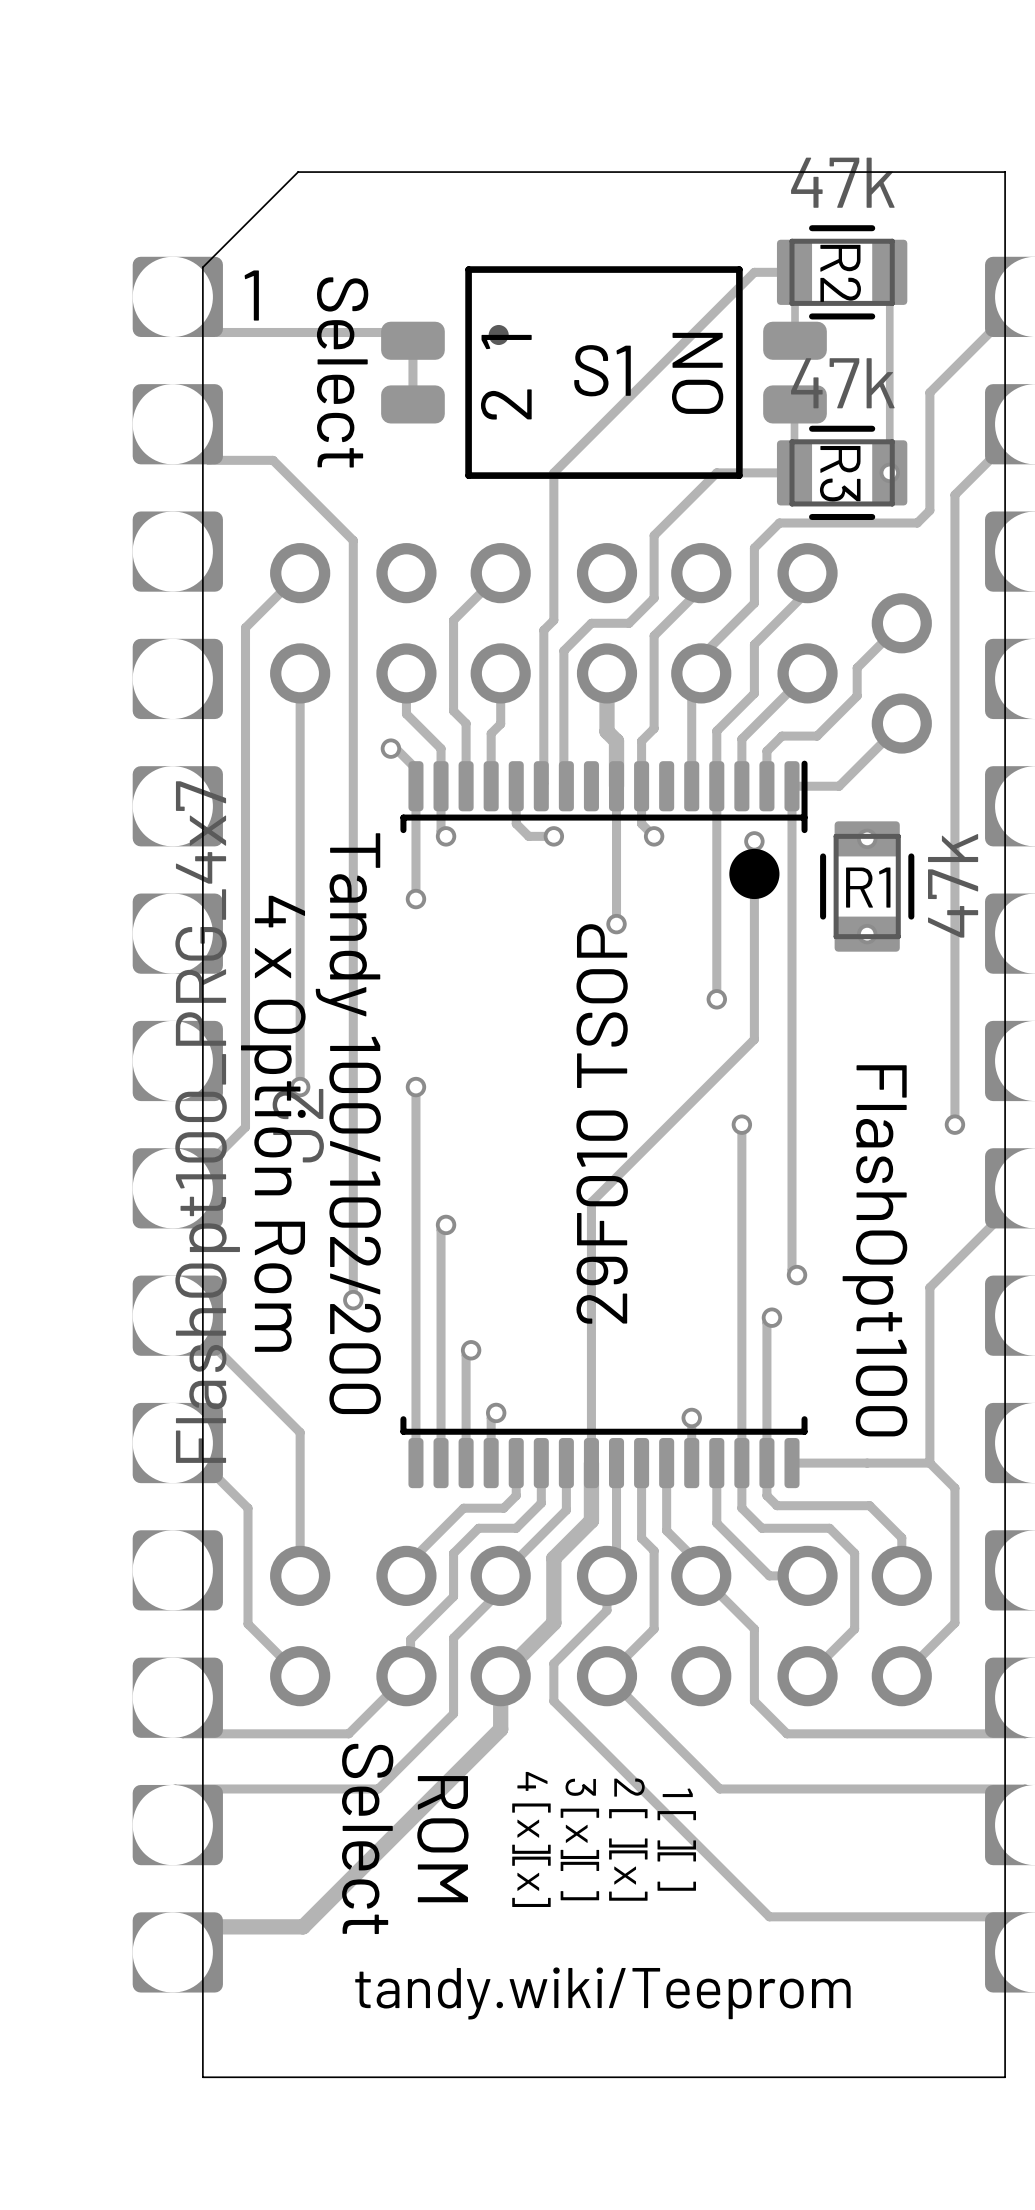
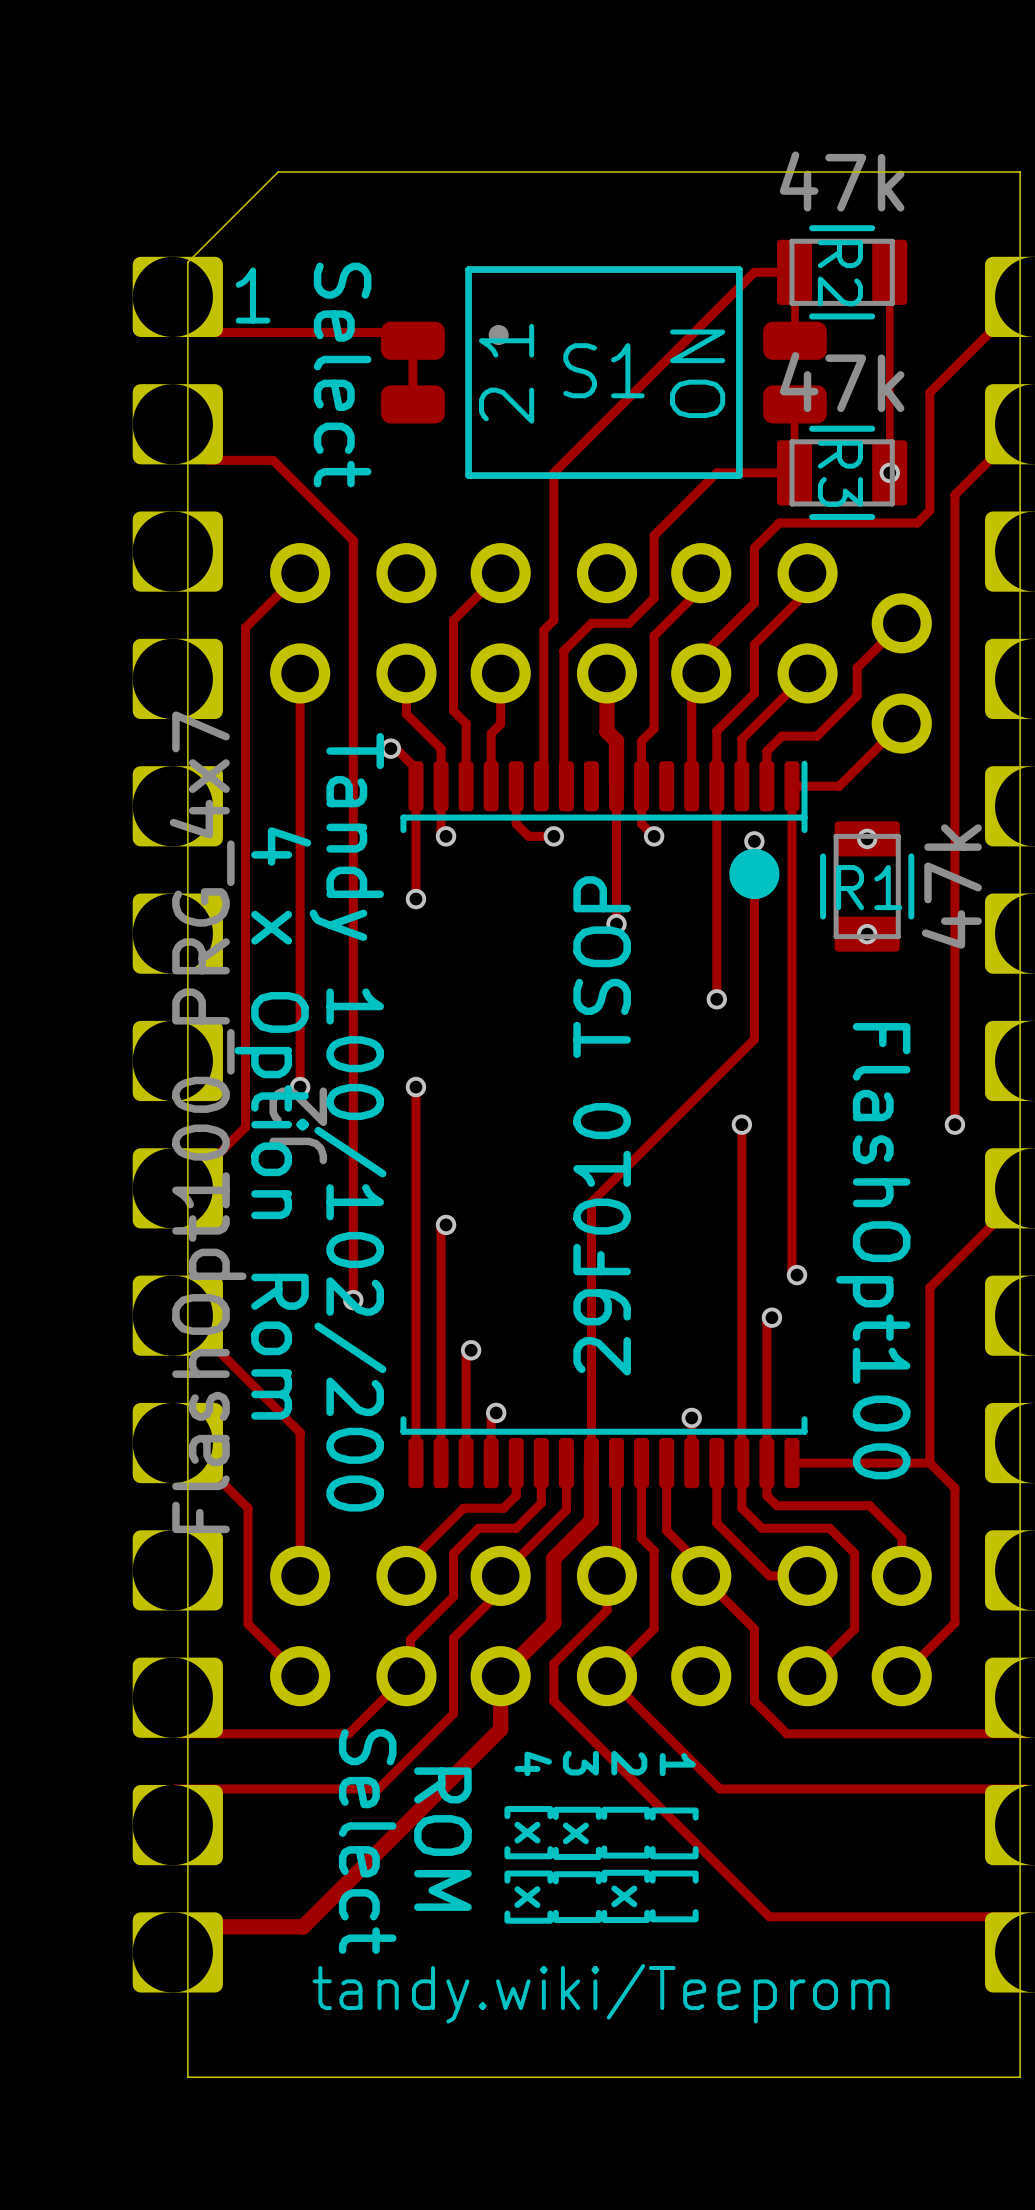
board edge: (298, 172) (202, 267) (202, 2077) -> (298, 172) (278, 172) (187, 262) (187, 2077) (202, 2077)
board edge: (1005, 172) (1005, 2077) -> (1005, 172) (1020, 172) (1020, 2077) (1005, 2077)

